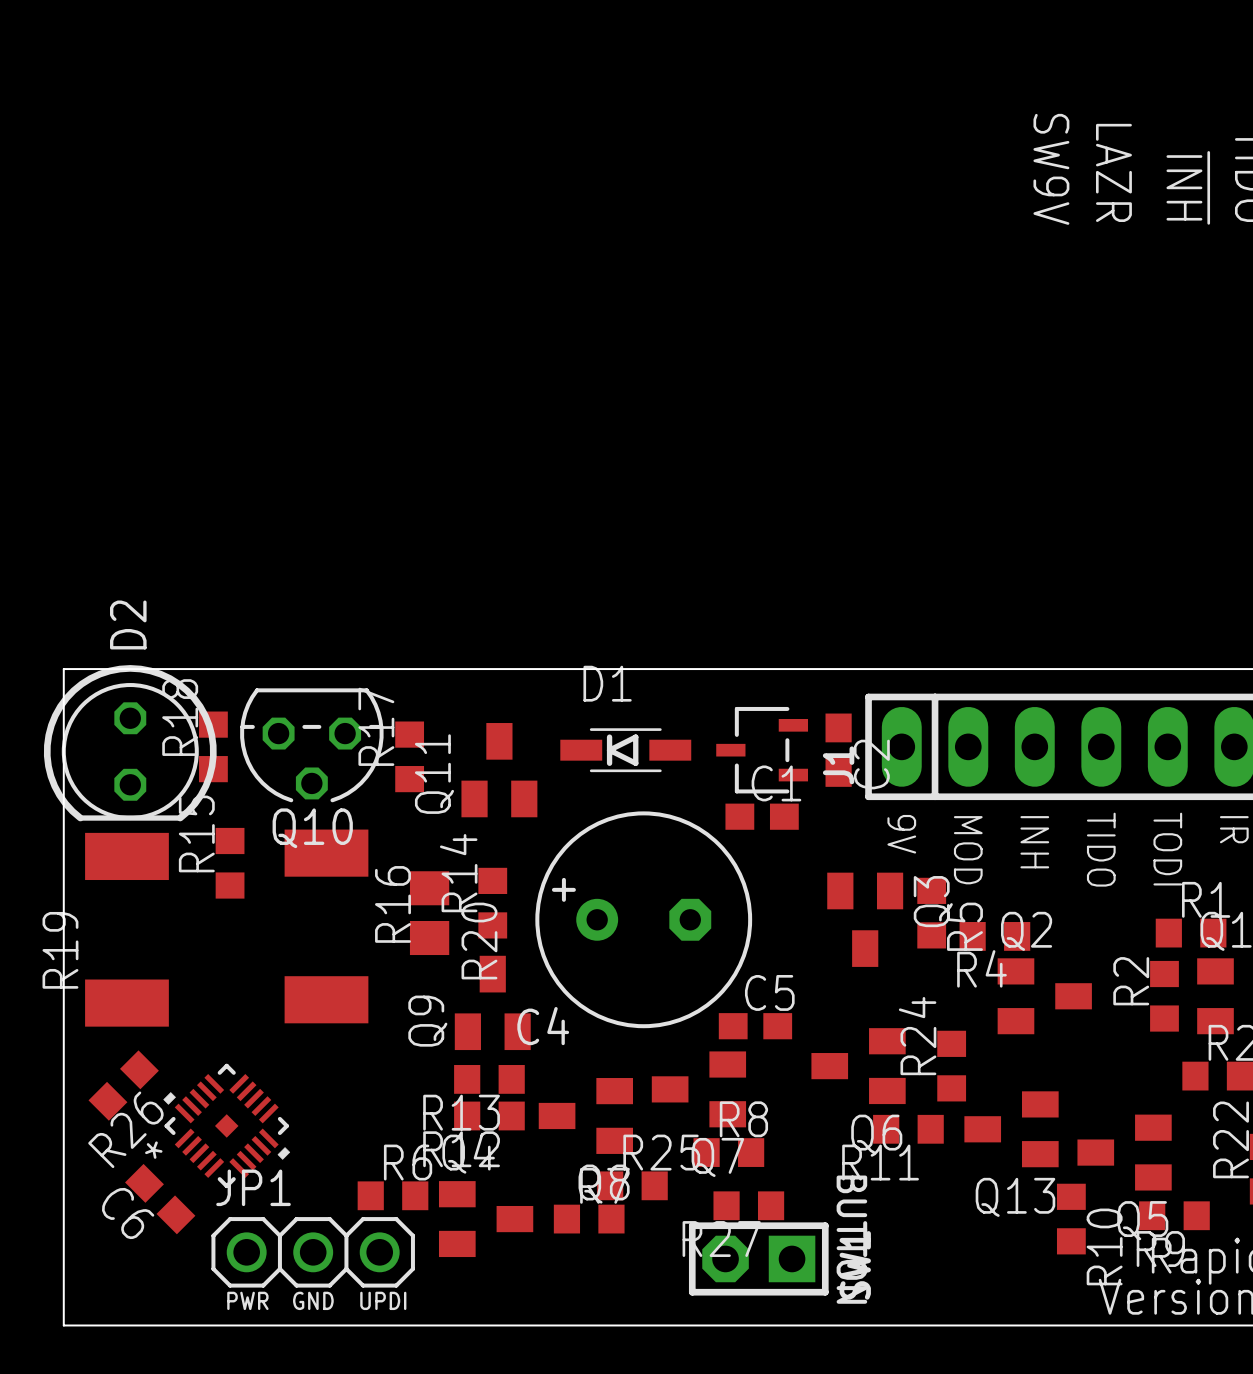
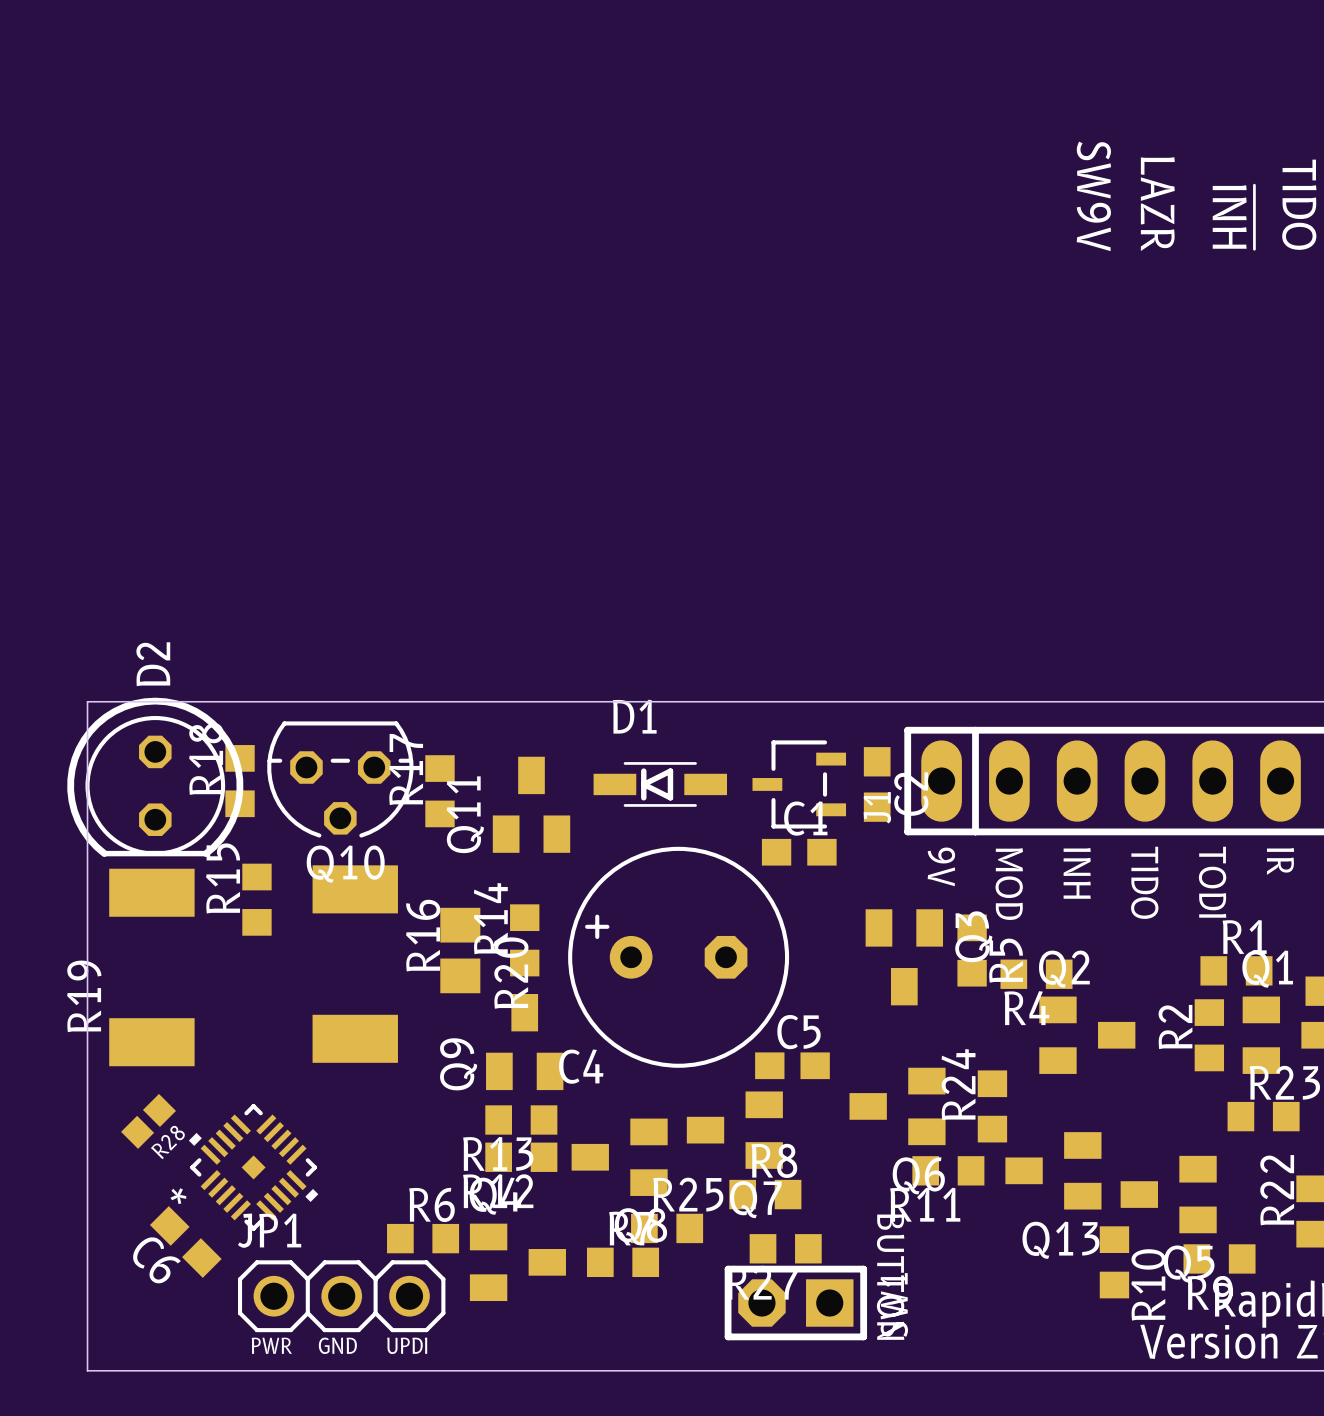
R28: none -> (148, 1121)
R26: (123, 1085) -> none

